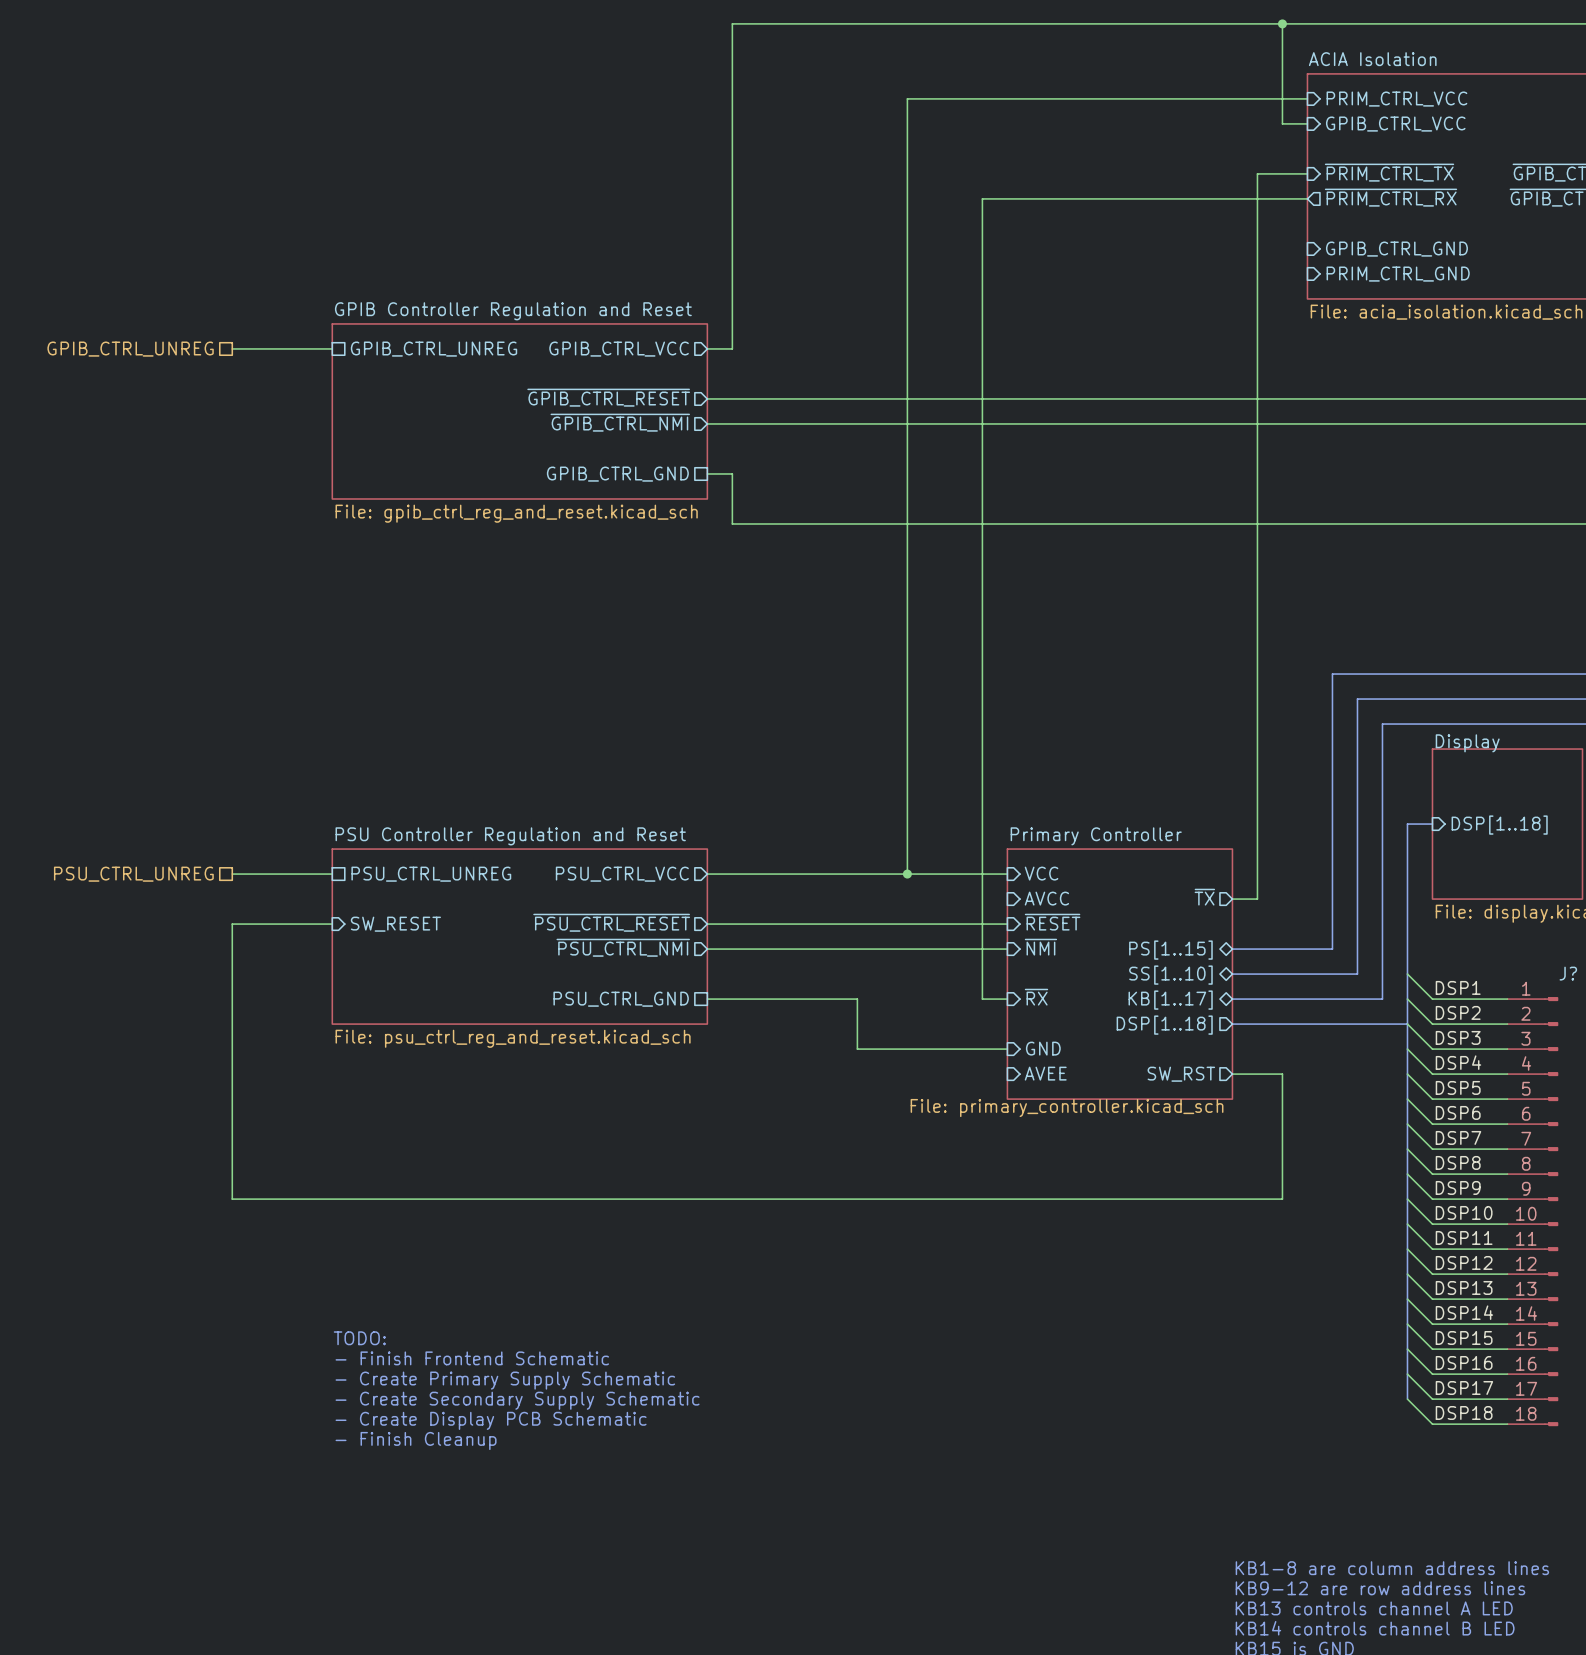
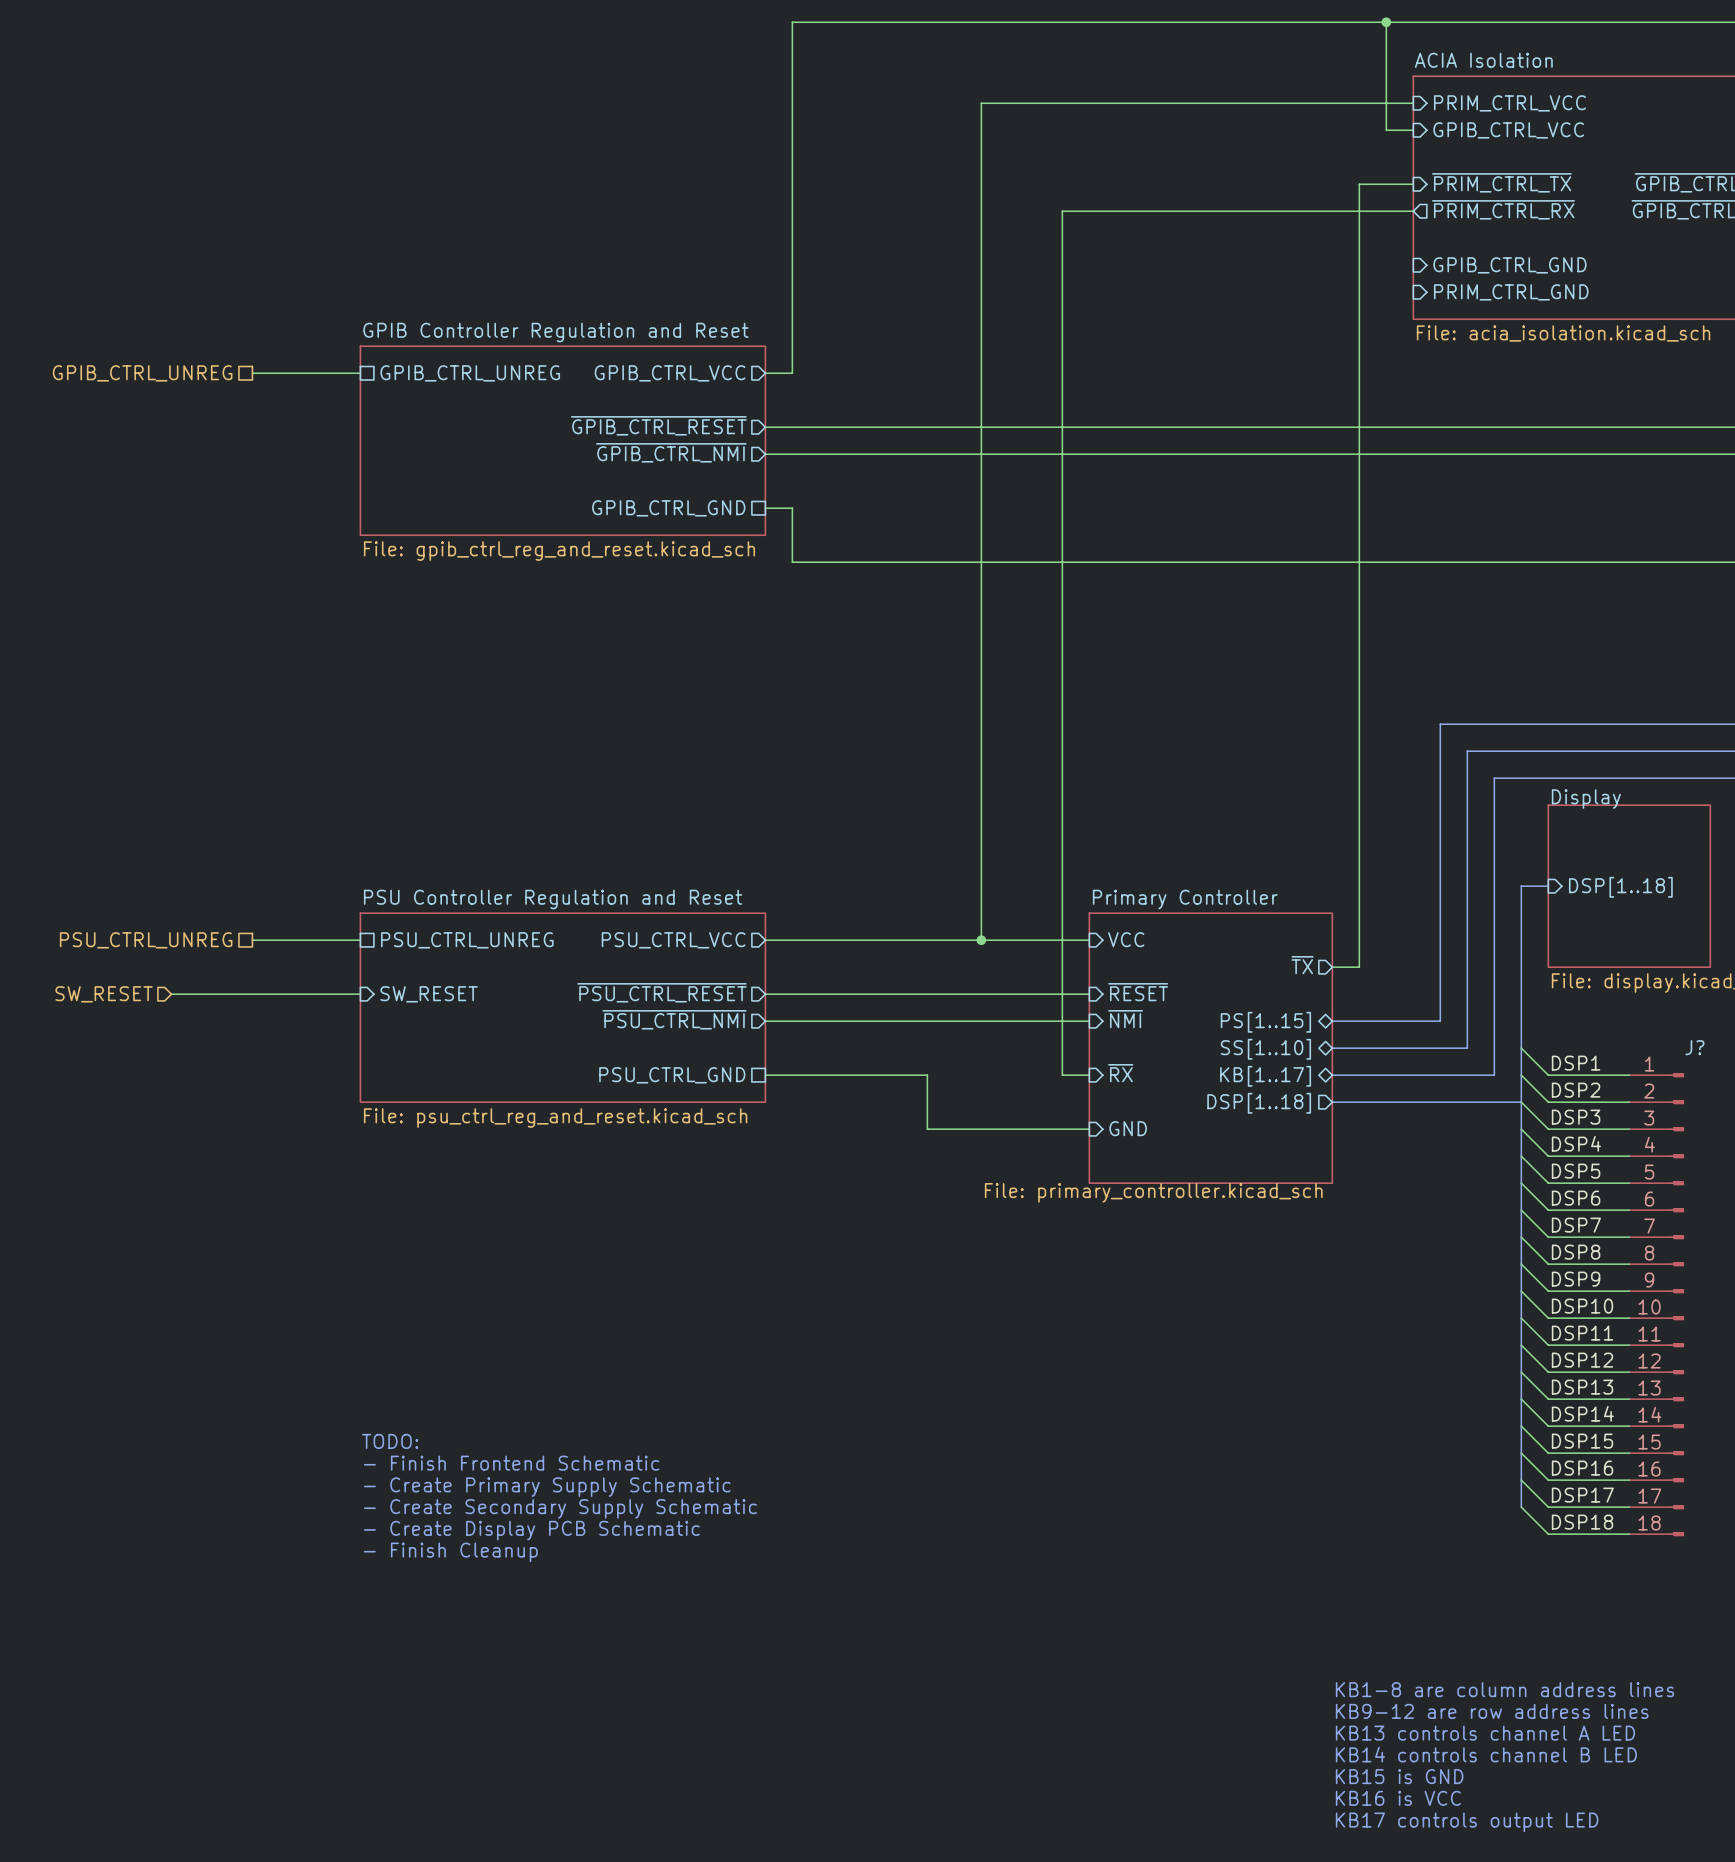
sheet pin: AVCC (1046, 898) -> none
hierarchical label: none -> SW_RESET (104, 994)
wire: (232, 924) (232, 1199) (1282, 1199) (1282, 1074) (1232, 1074) -> (252, 994) (171, 994)
sheet pin: AVEE (1045, 1073) -> none
sheet pin: SW_RST (1181, 1074) -> none

